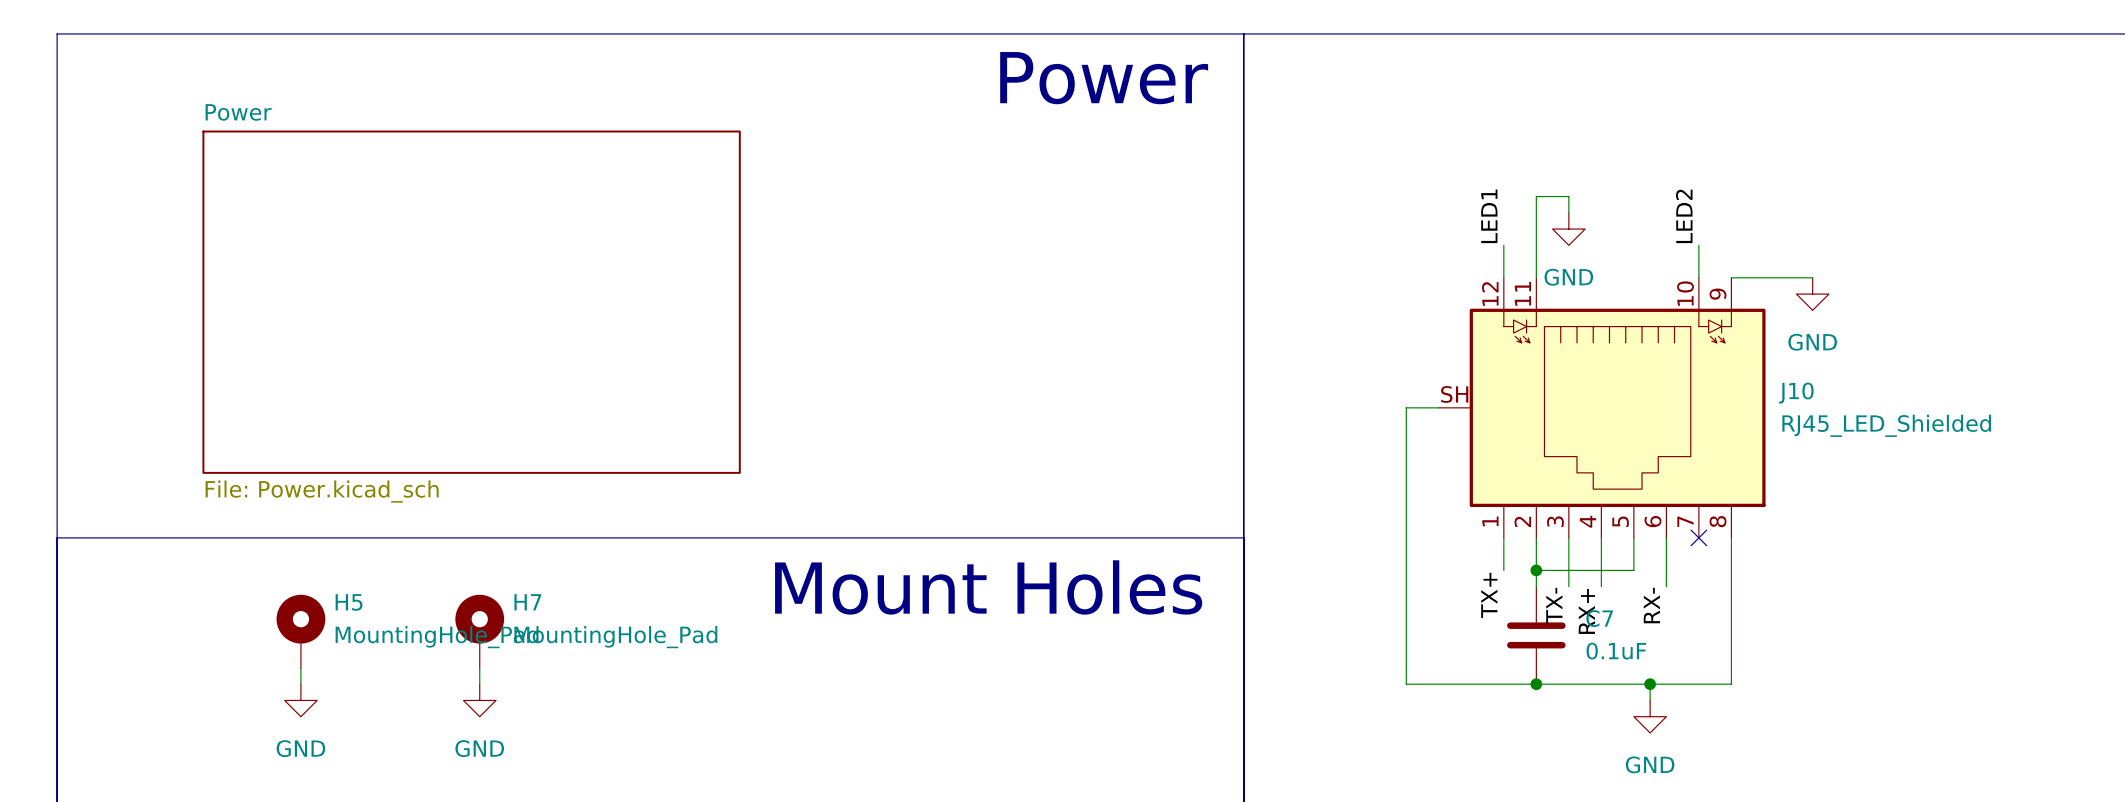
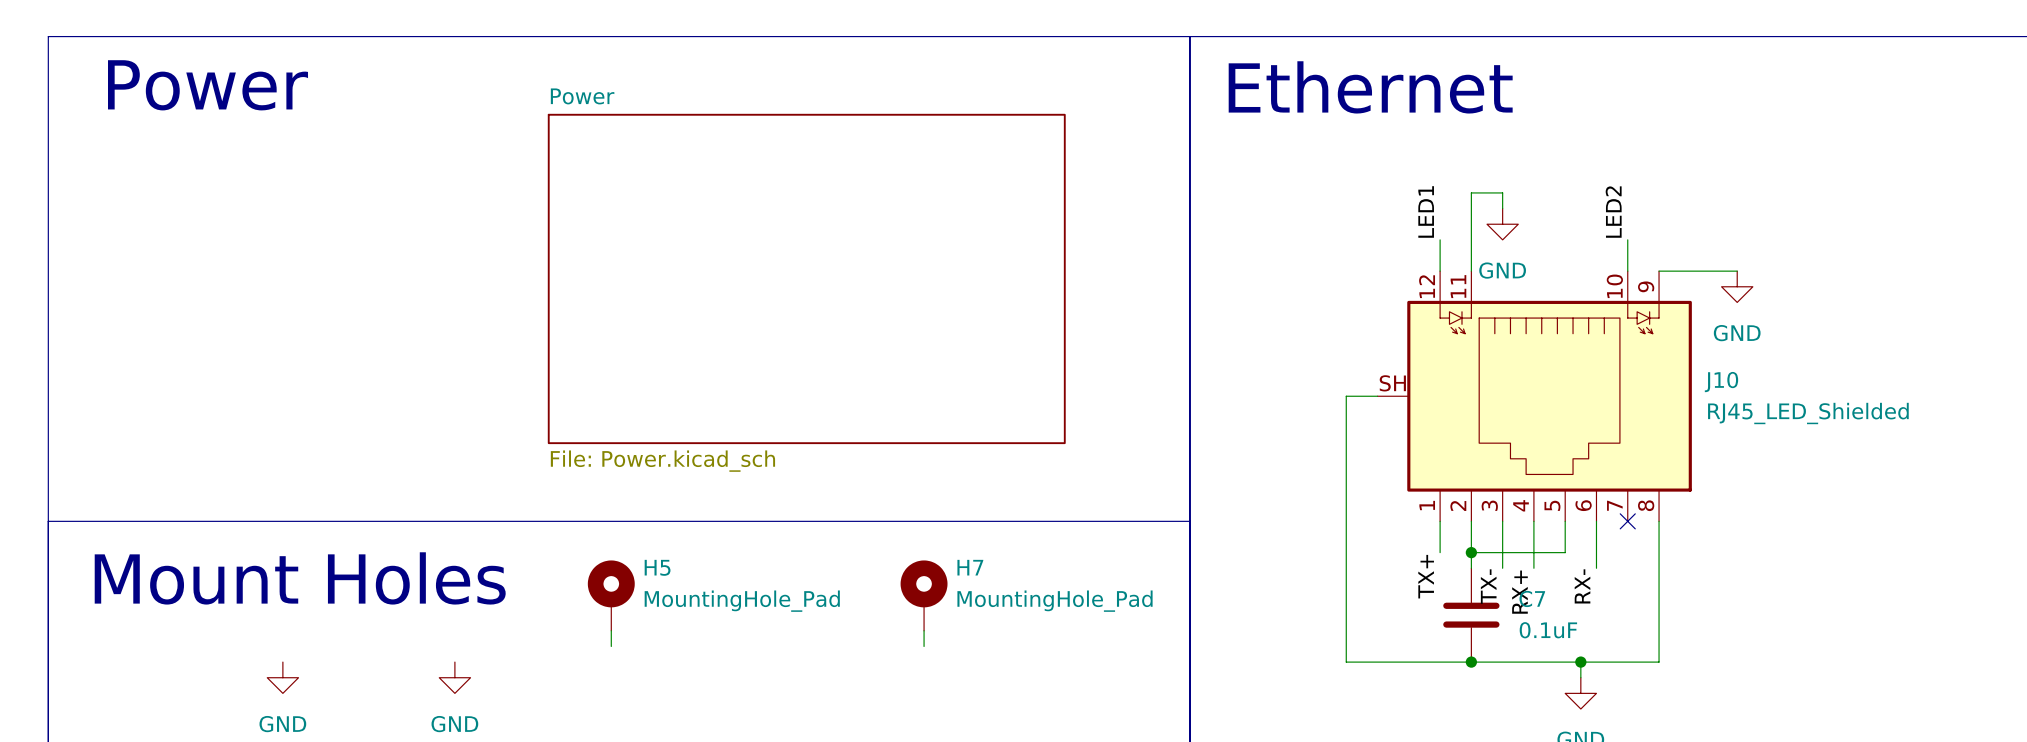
text: Power (1104, 78) -> none
text: none -> Power (208, 85)
text: none -> Ethernet (1370, 87)
sheet Power: none -> File: Power.kicad_sch (806, 278)
sheet Power: File: Power.kicad_sch (471, 302) -> none
text: Mount Holes (988, 587) -> none
text: none -> Mount Holes (300, 578)
H5 position: (300, 631) -> (611, 595)
H7 position: (479, 631) -> (924, 595)
wire: none -> (924, 630) (924, 646)
wire: (300, 667) (300, 684) -> none
wire: (479, 667) (479, 684) -> (611, 630) (611, 646)

